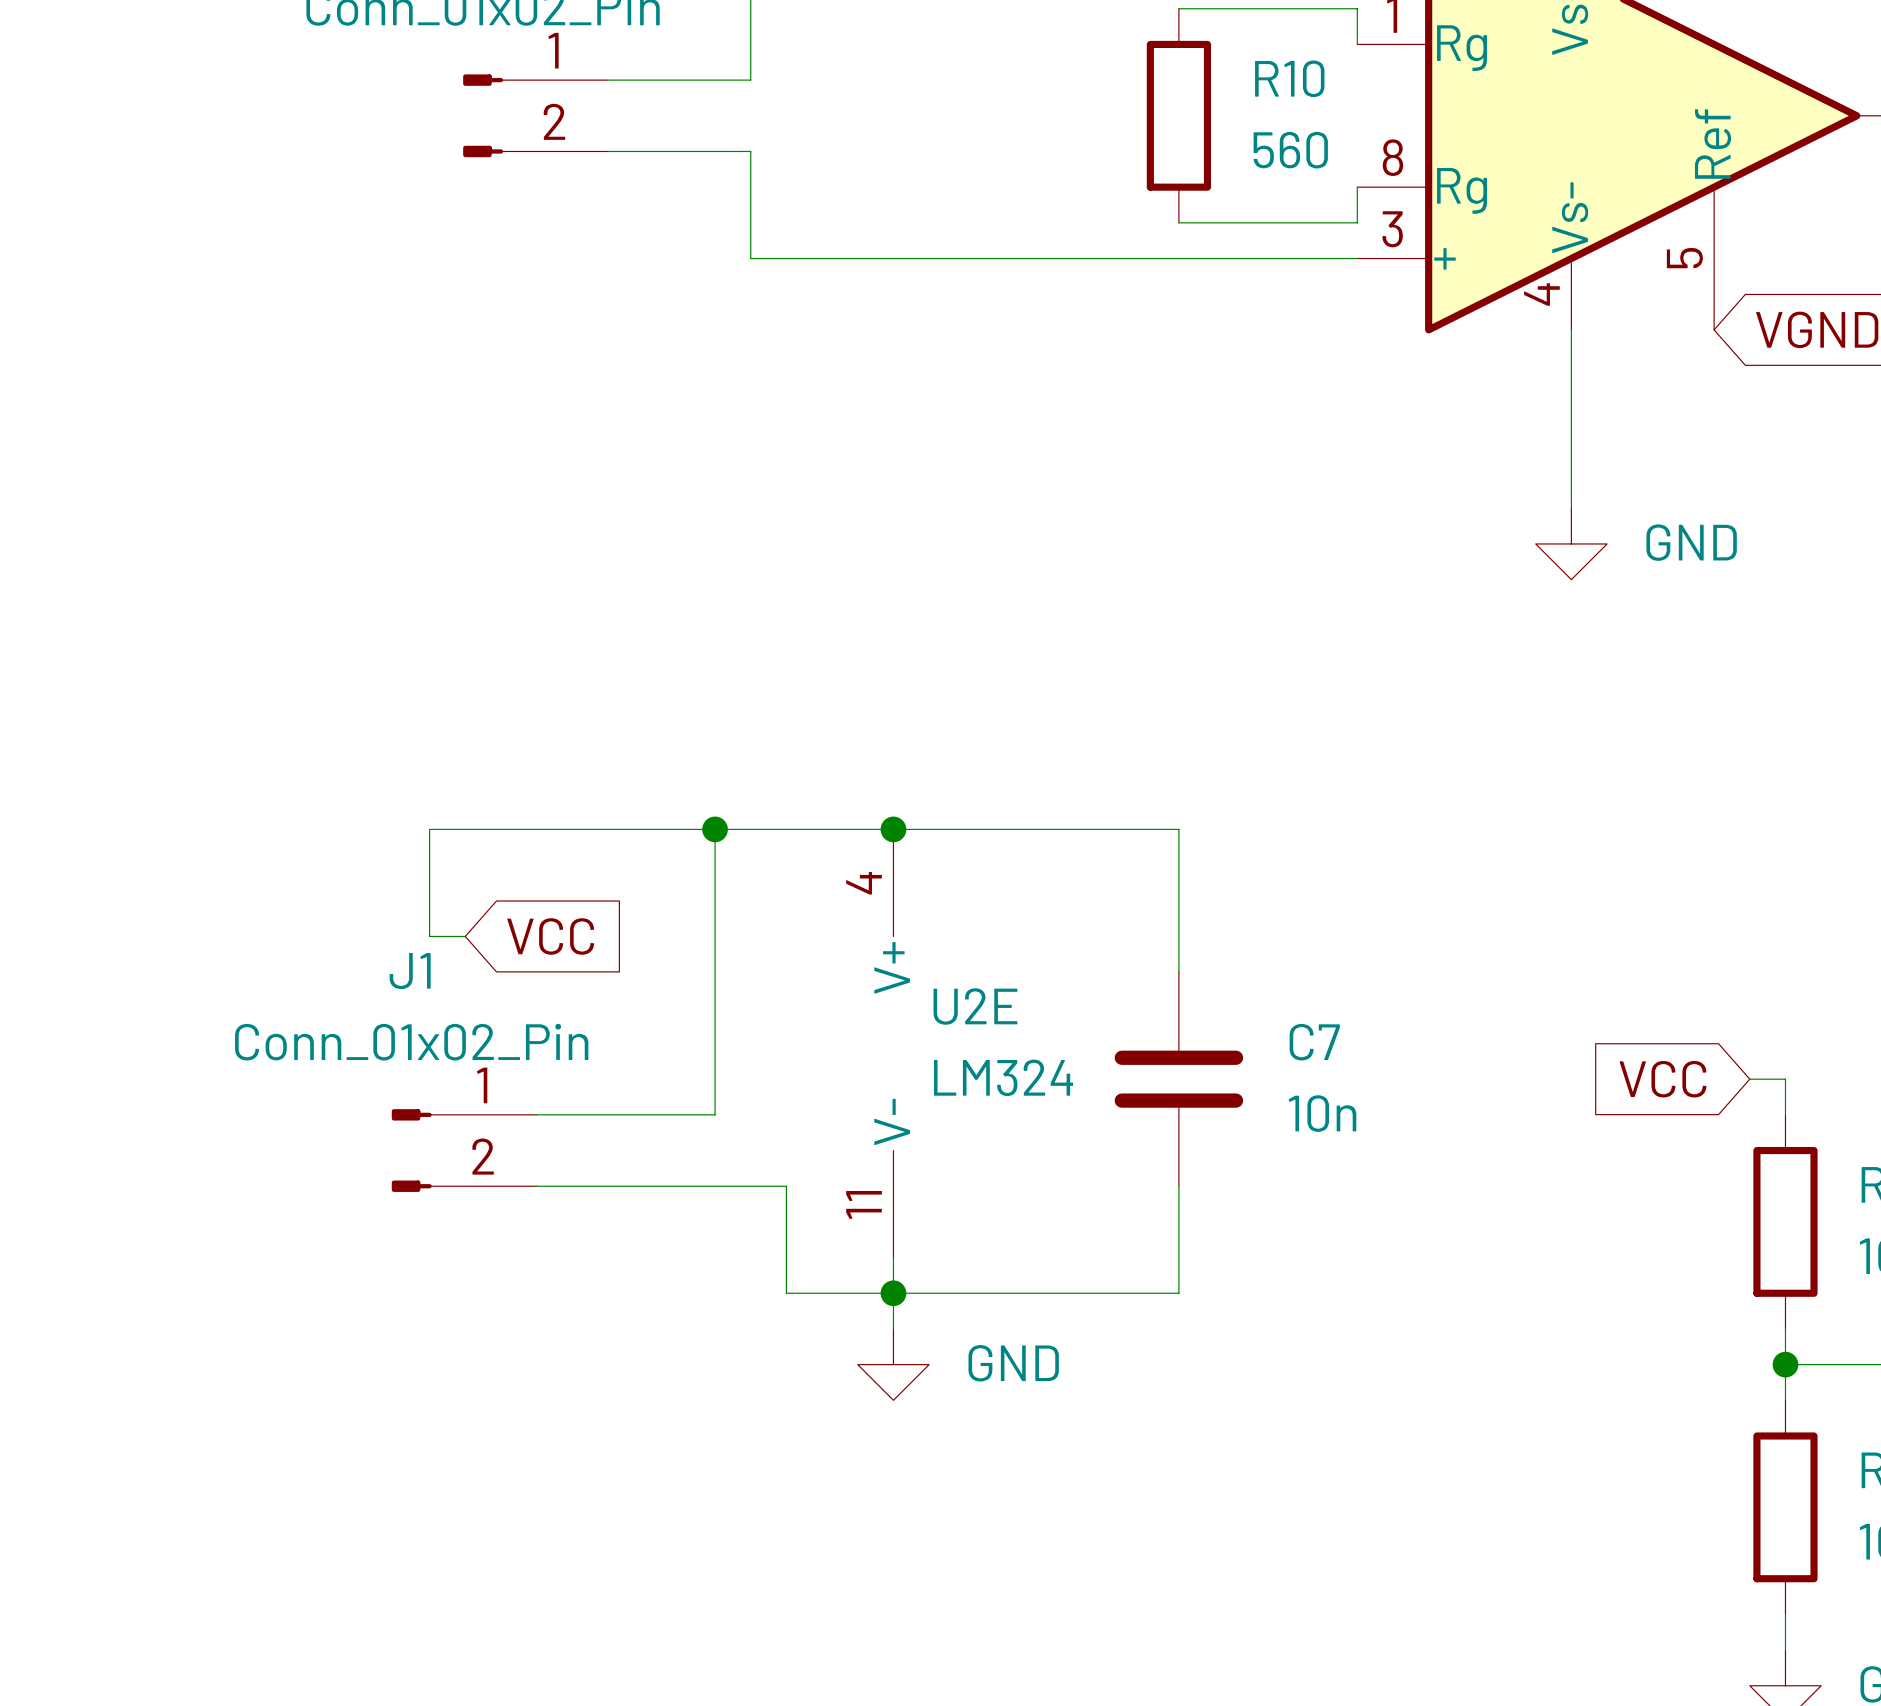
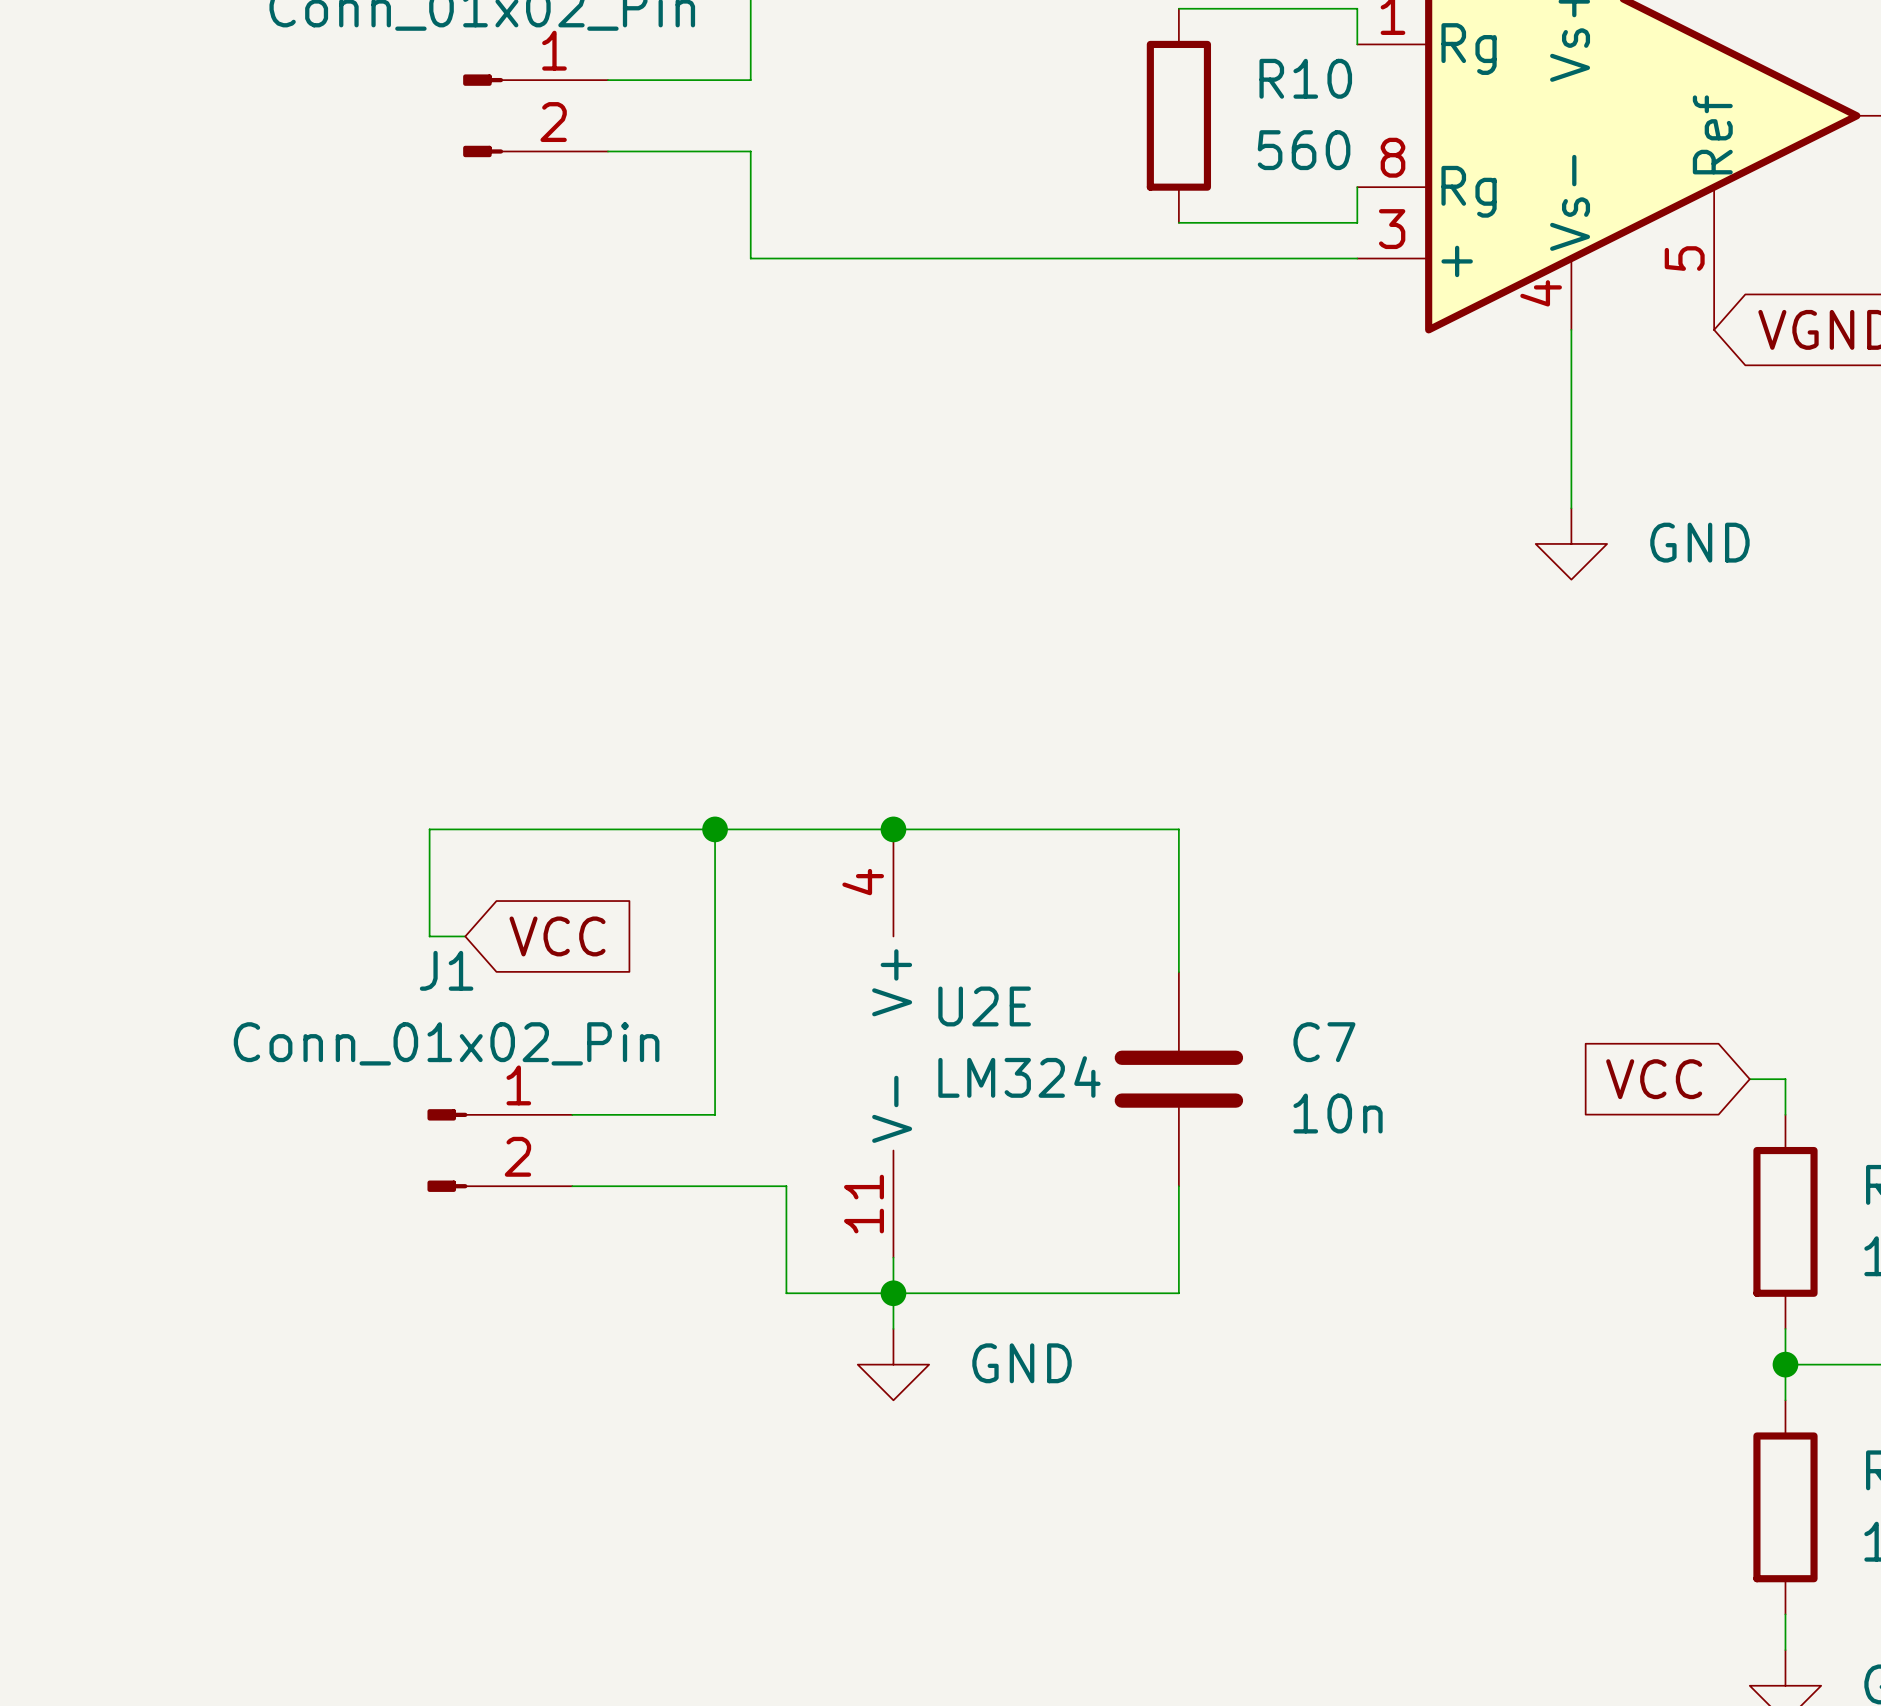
J1 position: (464, 1150) -> (499, 1150)

